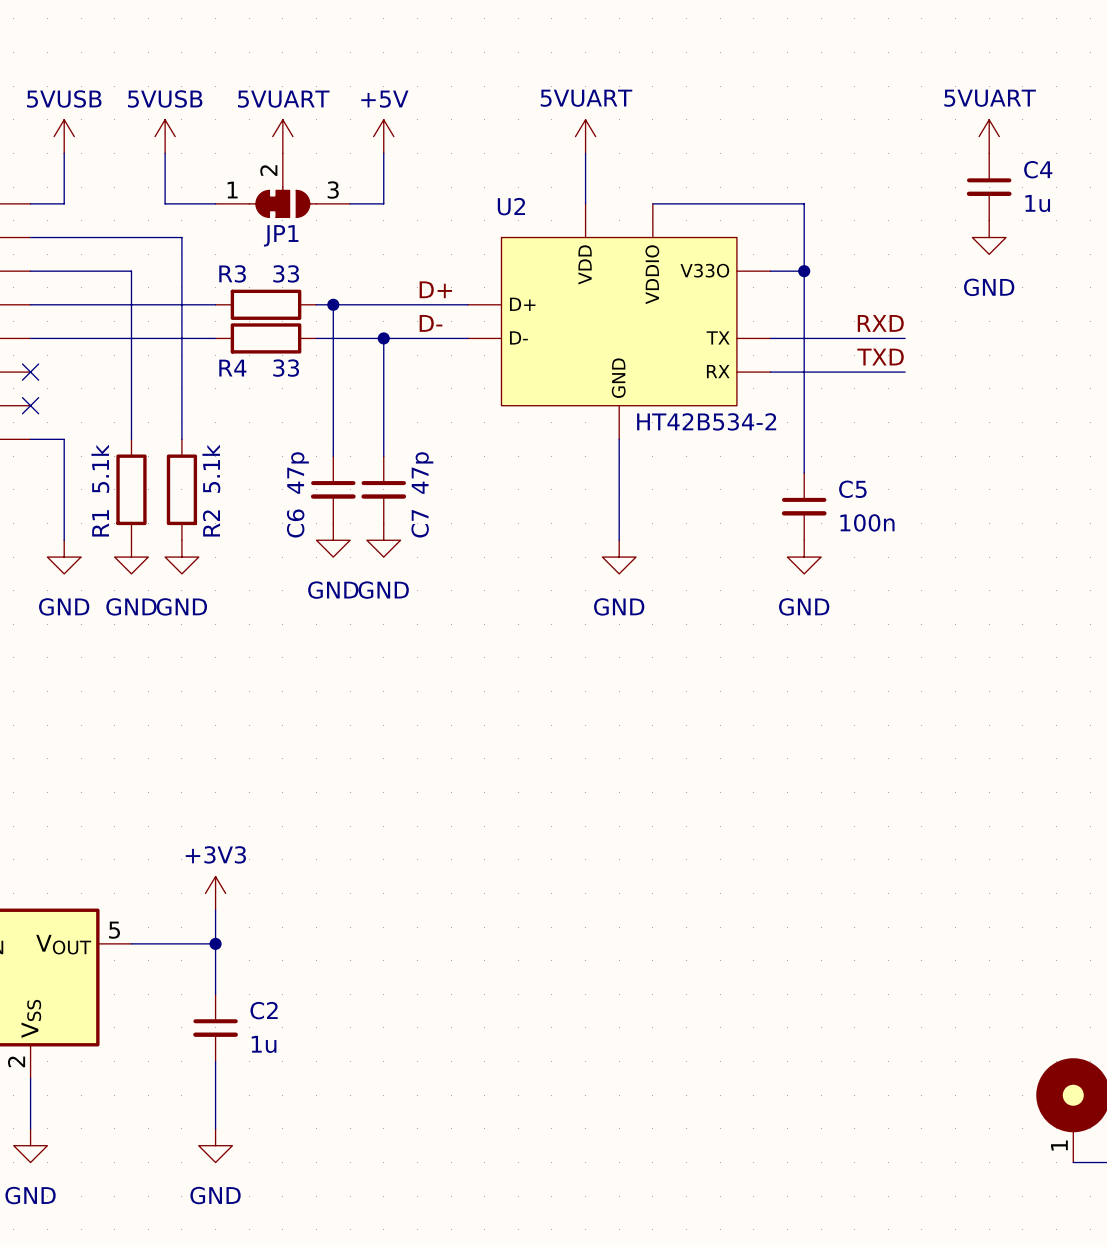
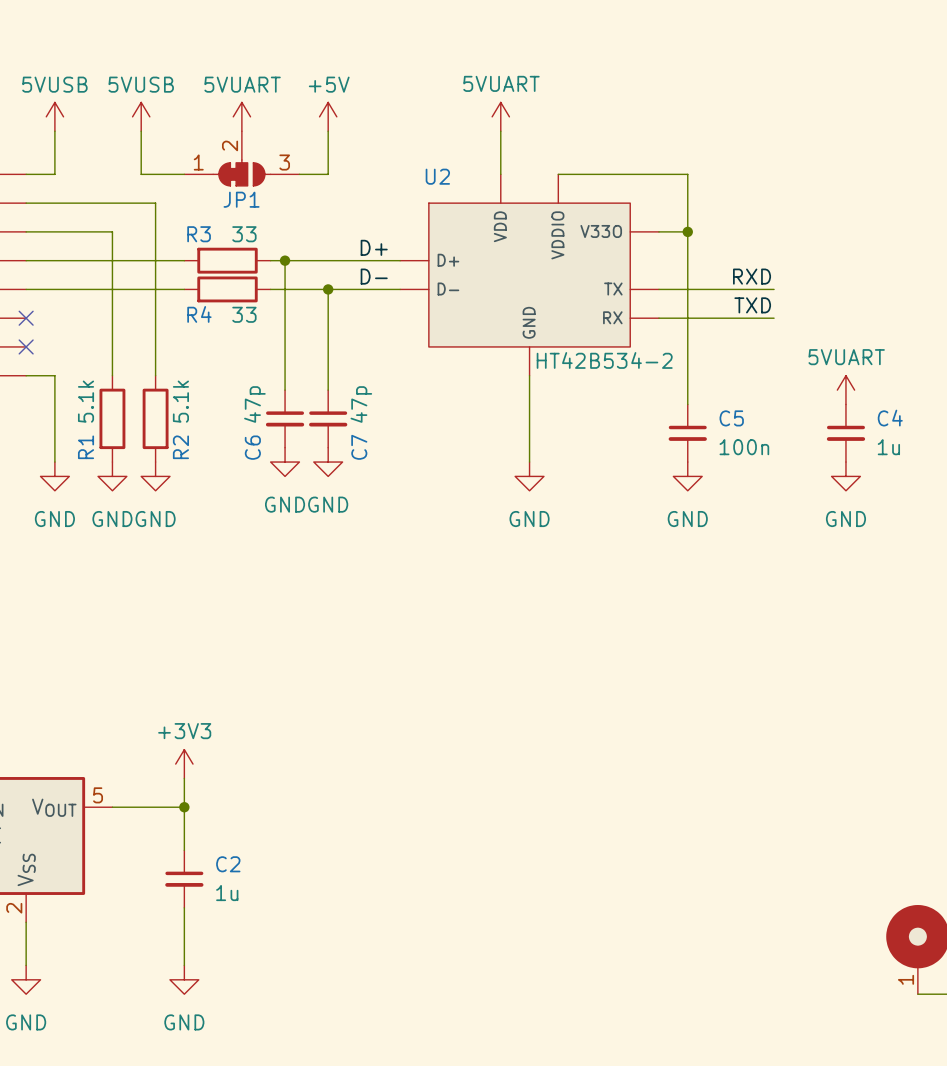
power symbol position: 5VUART (989, 136) -> 5VUART (845, 390)
C4 position: (989, 187) -> (845, 433)
power symbol position: GND (989, 237) -> GND (845, 476)

